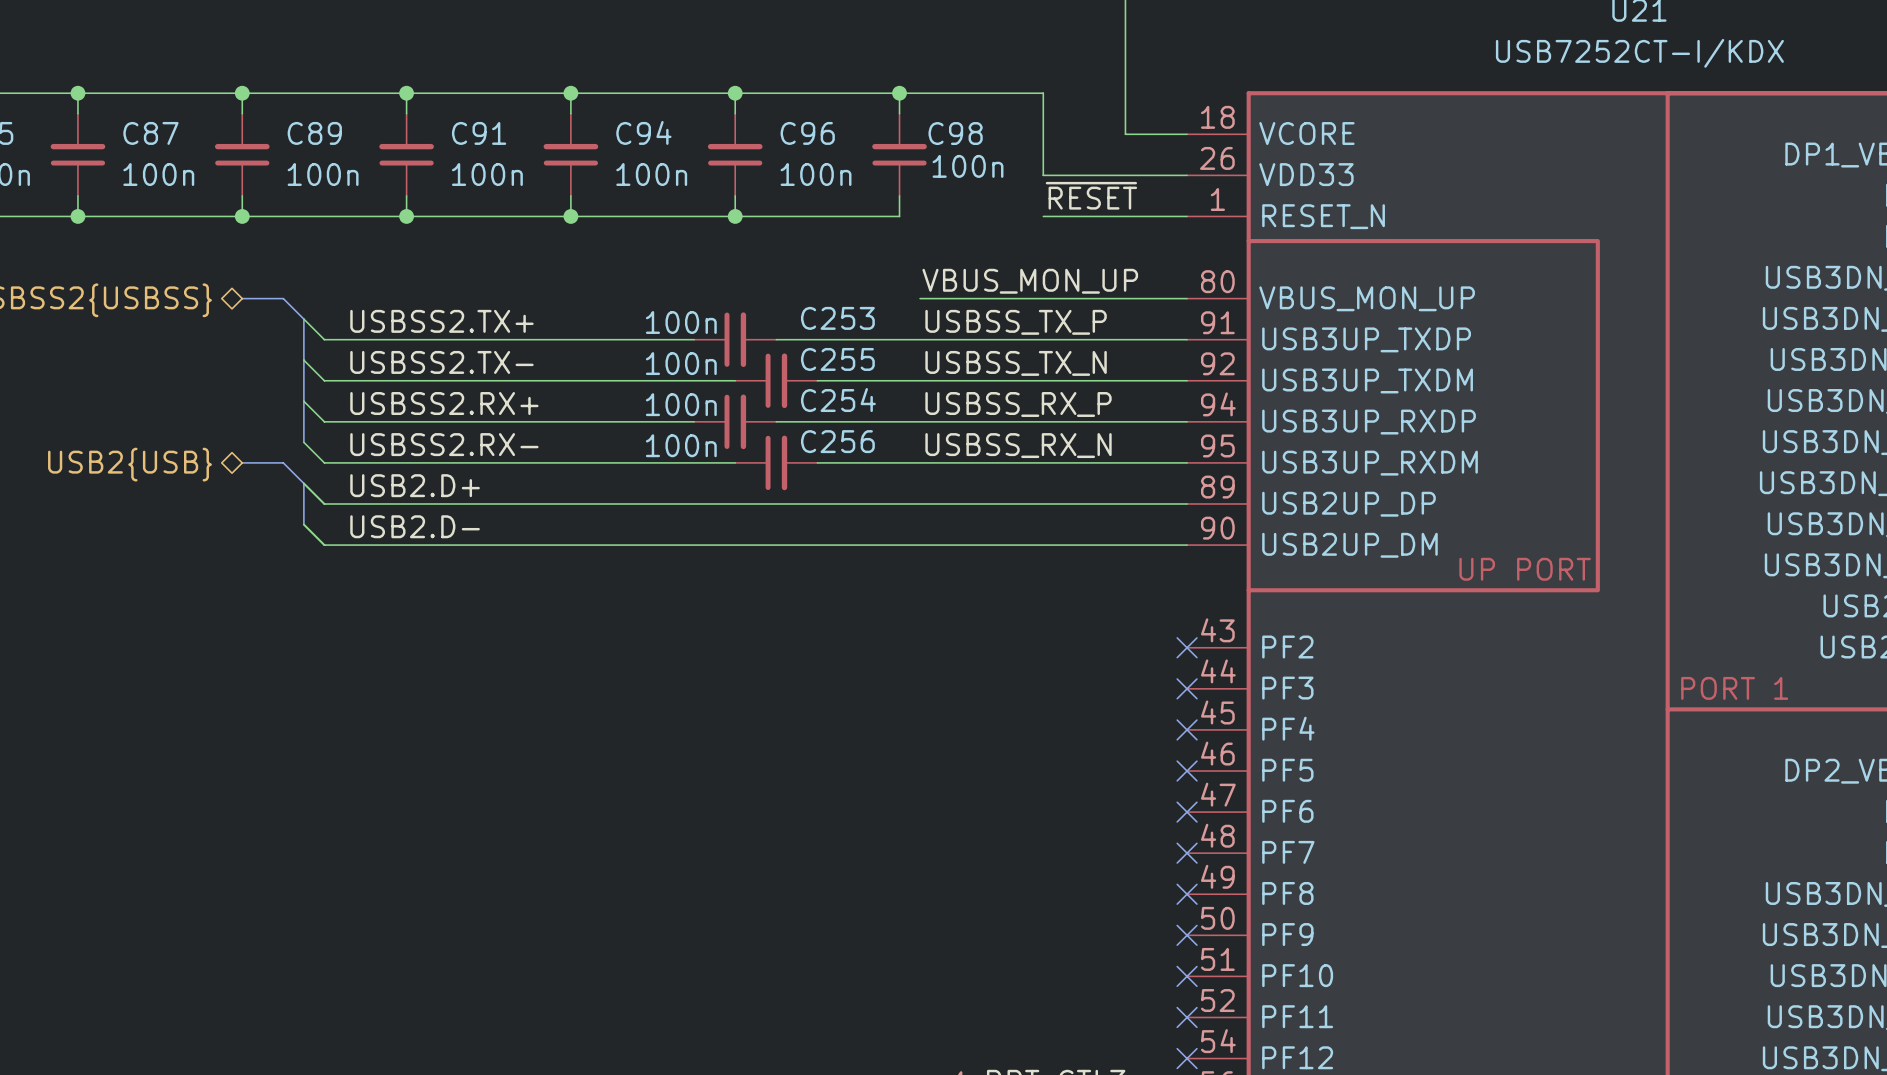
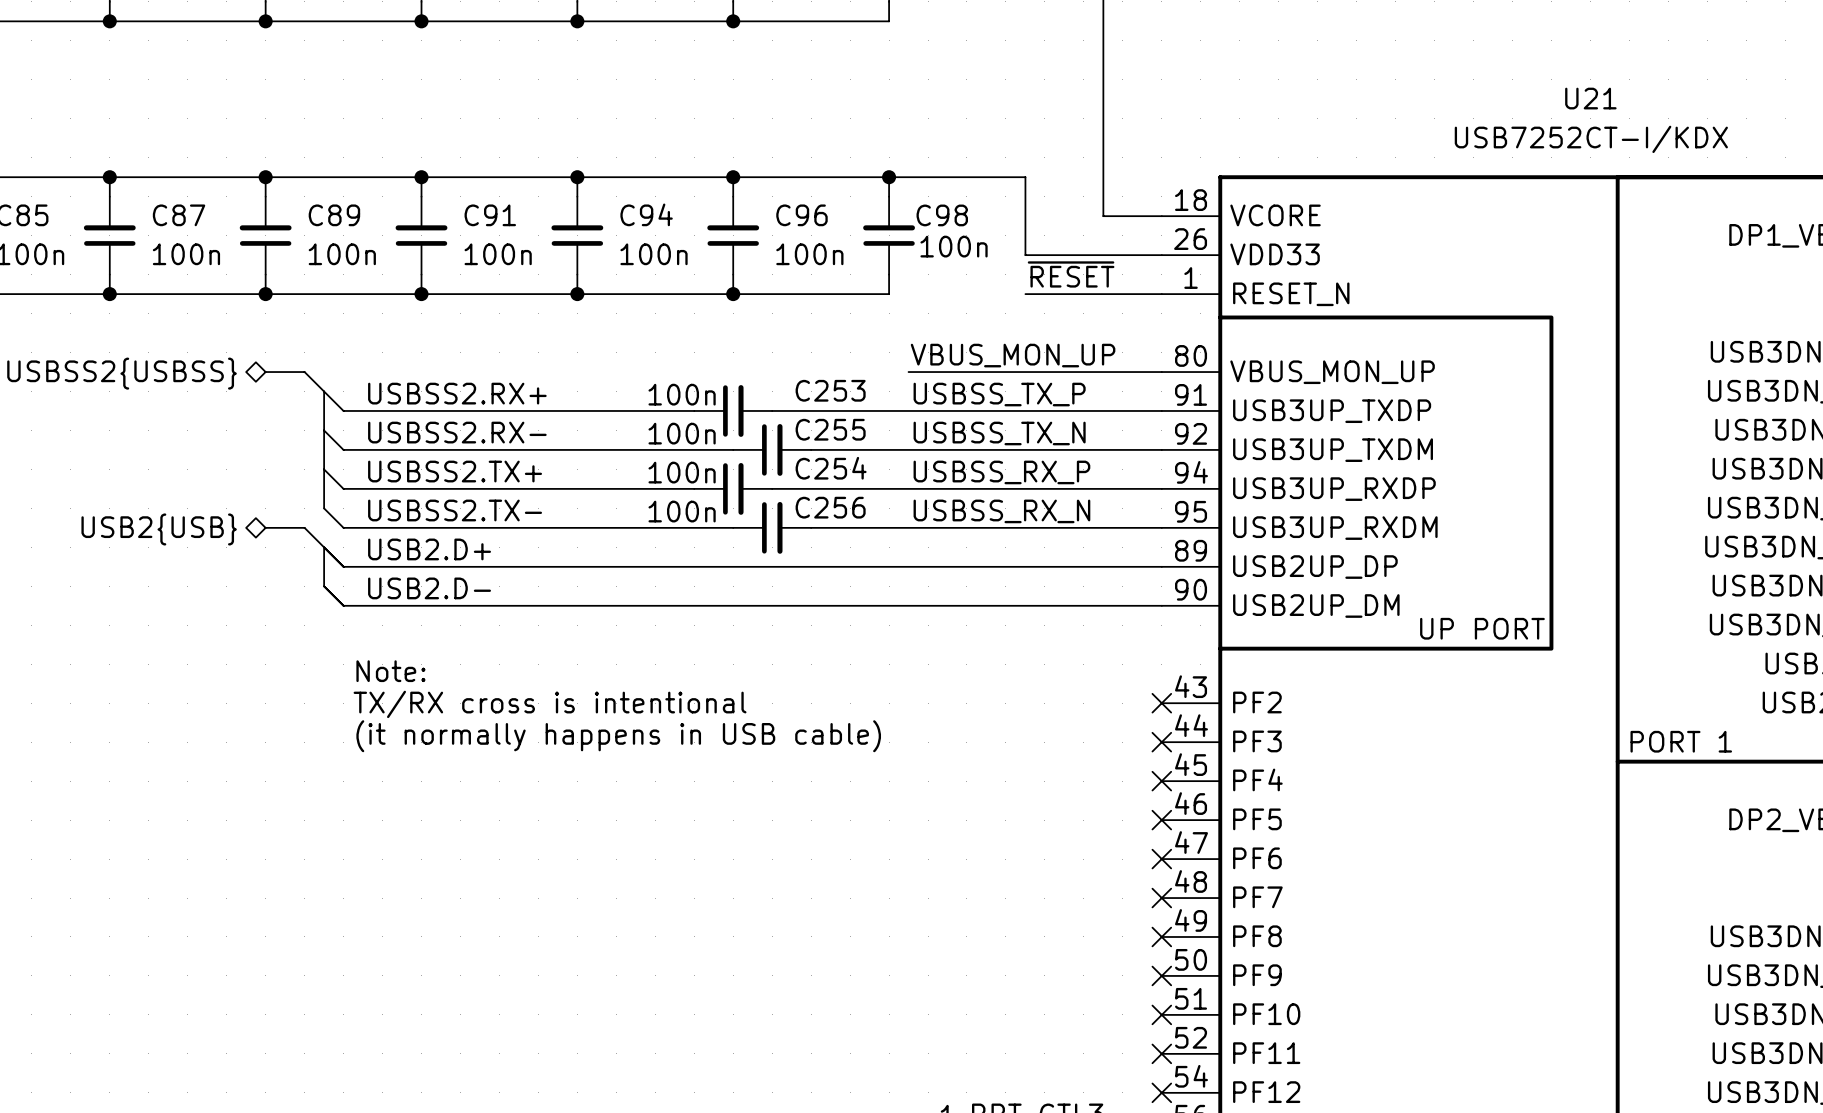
label: USBSS2.TX+ (441, 321) -> USBSS2.RX+ (457, 393)
label: USBSS2.TX- (441, 362) -> USBSS2.RX- (457, 432)
label: USBSS2.RX+ (444, 403) -> USBSS2.TX+ (455, 471)
label: USBSS2.RX- (444, 444) -> USBSS2.TX- (455, 510)
text: none -> Note: (390, 671)
text: none -> TX/RX cross is intentional (550, 704)
text: none -> (it normally happens in USB cable) (618, 736)

